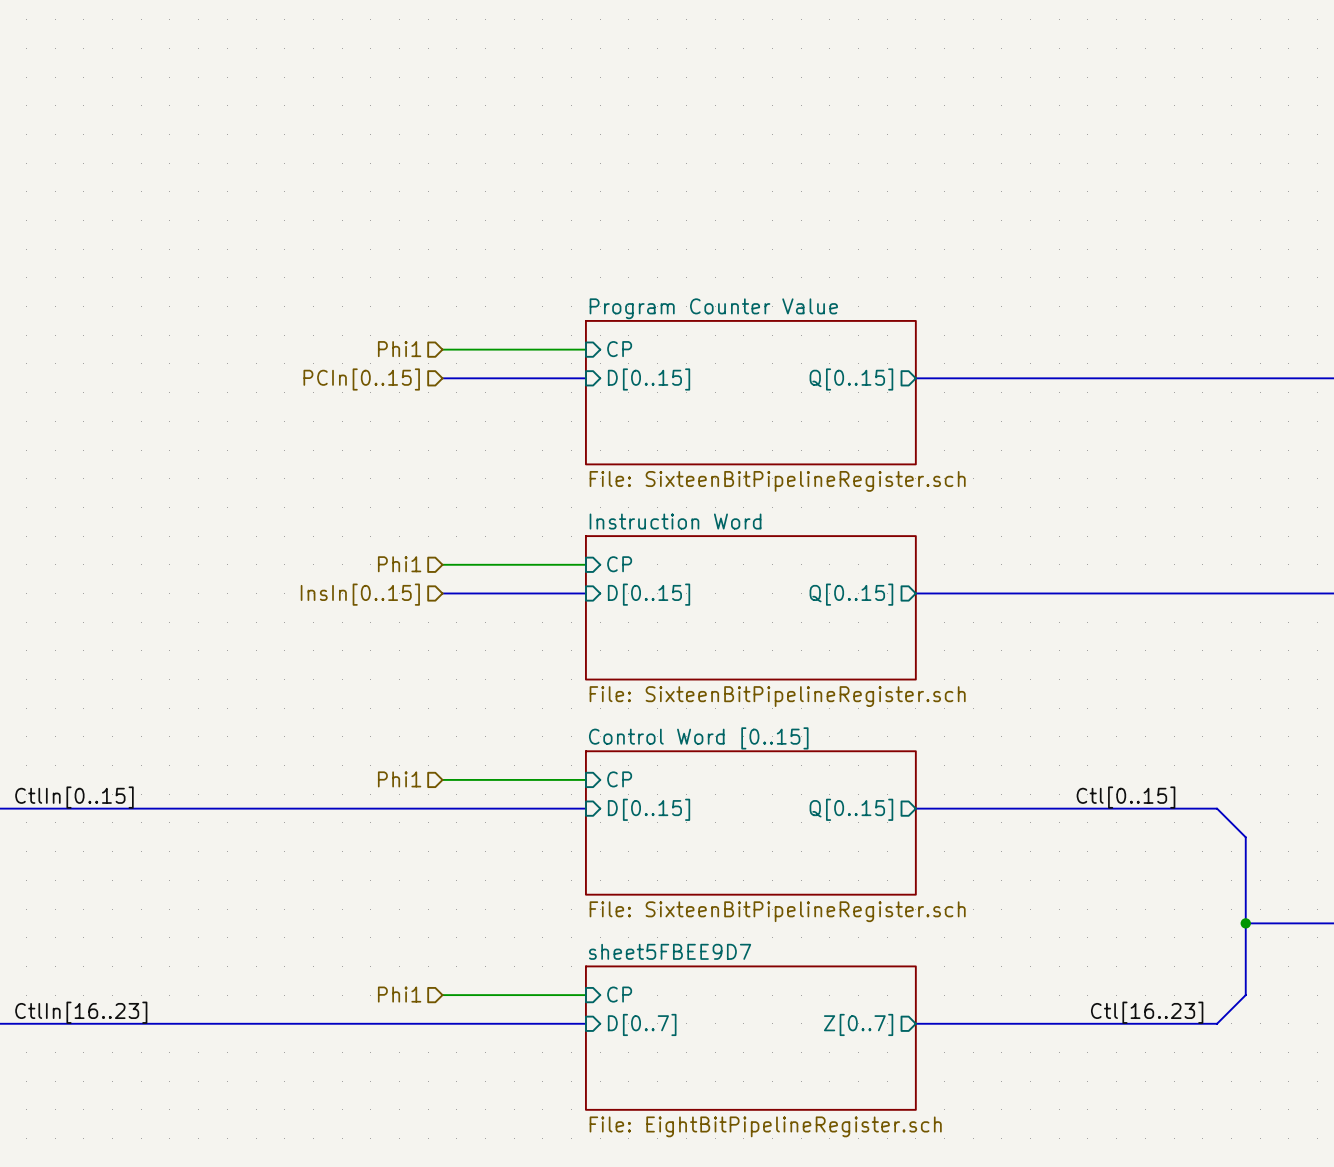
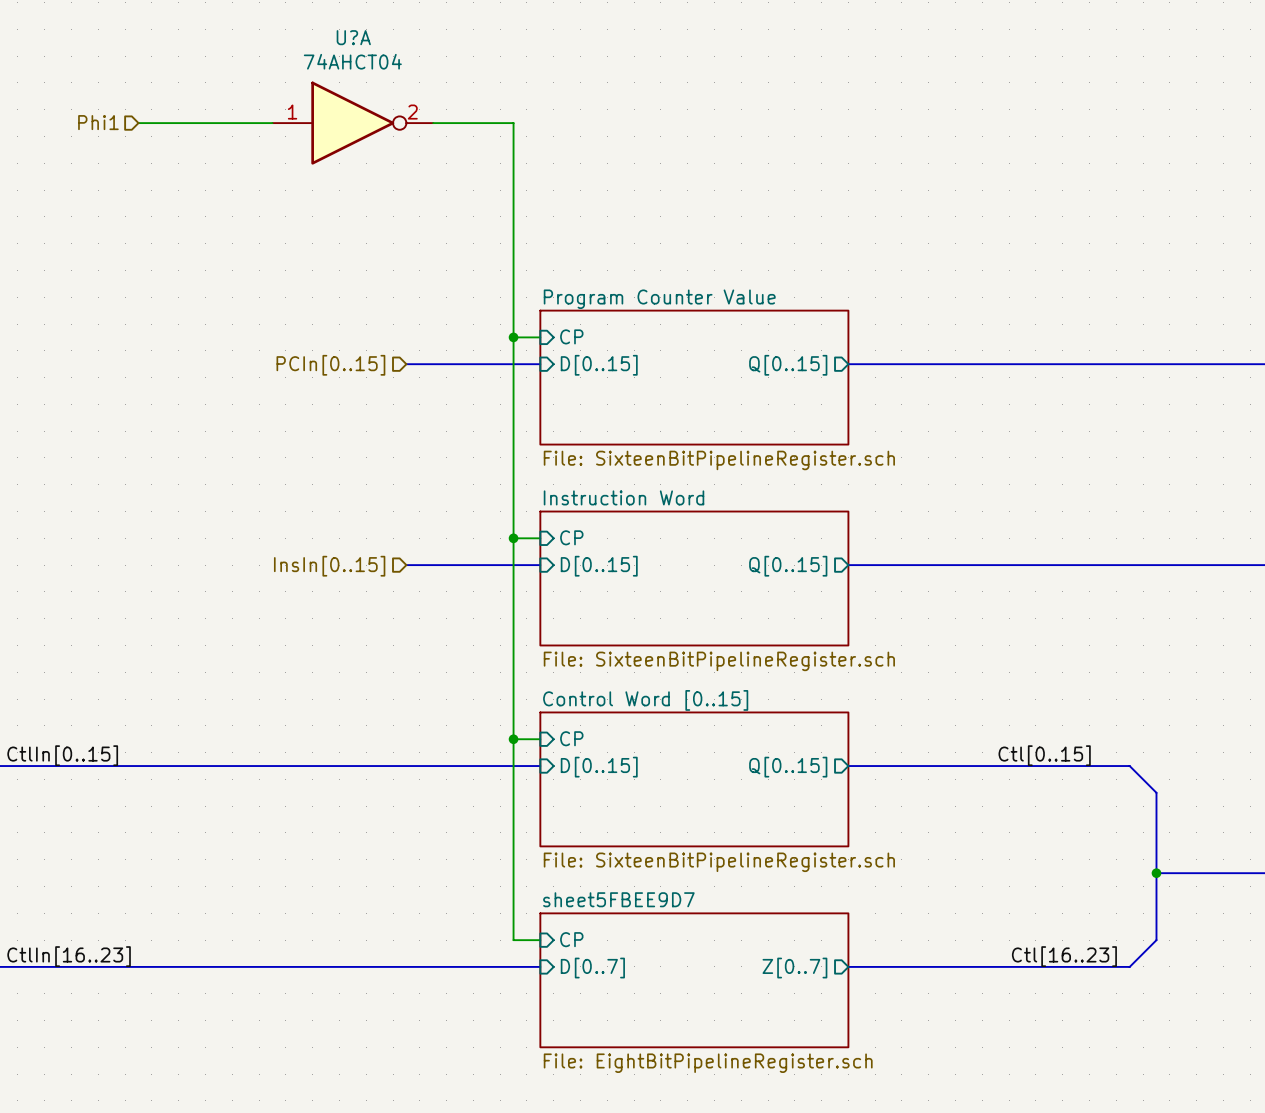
hierarchical label: none -> Phi1 (98, 122)
wire: none -> (138, 123) (272, 123)
U?A: none -> 74AHCT04 (352, 123)
hierarchical label: Phi1 (399, 349) -> none
wire: (442, 349) (557, 349) -> none
junction: none -> (513, 337)
hierarchical label: Phi1 (399, 564) -> none
wire: (442, 564) (557, 564) -> none
junction: none -> (513, 538)
hierarchical label: Phi1 (399, 779) -> none
wire: (442, 779) (557, 779) -> none
junction: none -> (513, 739)
hierarchical label: Phi1 (399, 994) -> none
wire: (442, 995) (557, 995) -> (433, 123) (513, 123) (513, 940)

